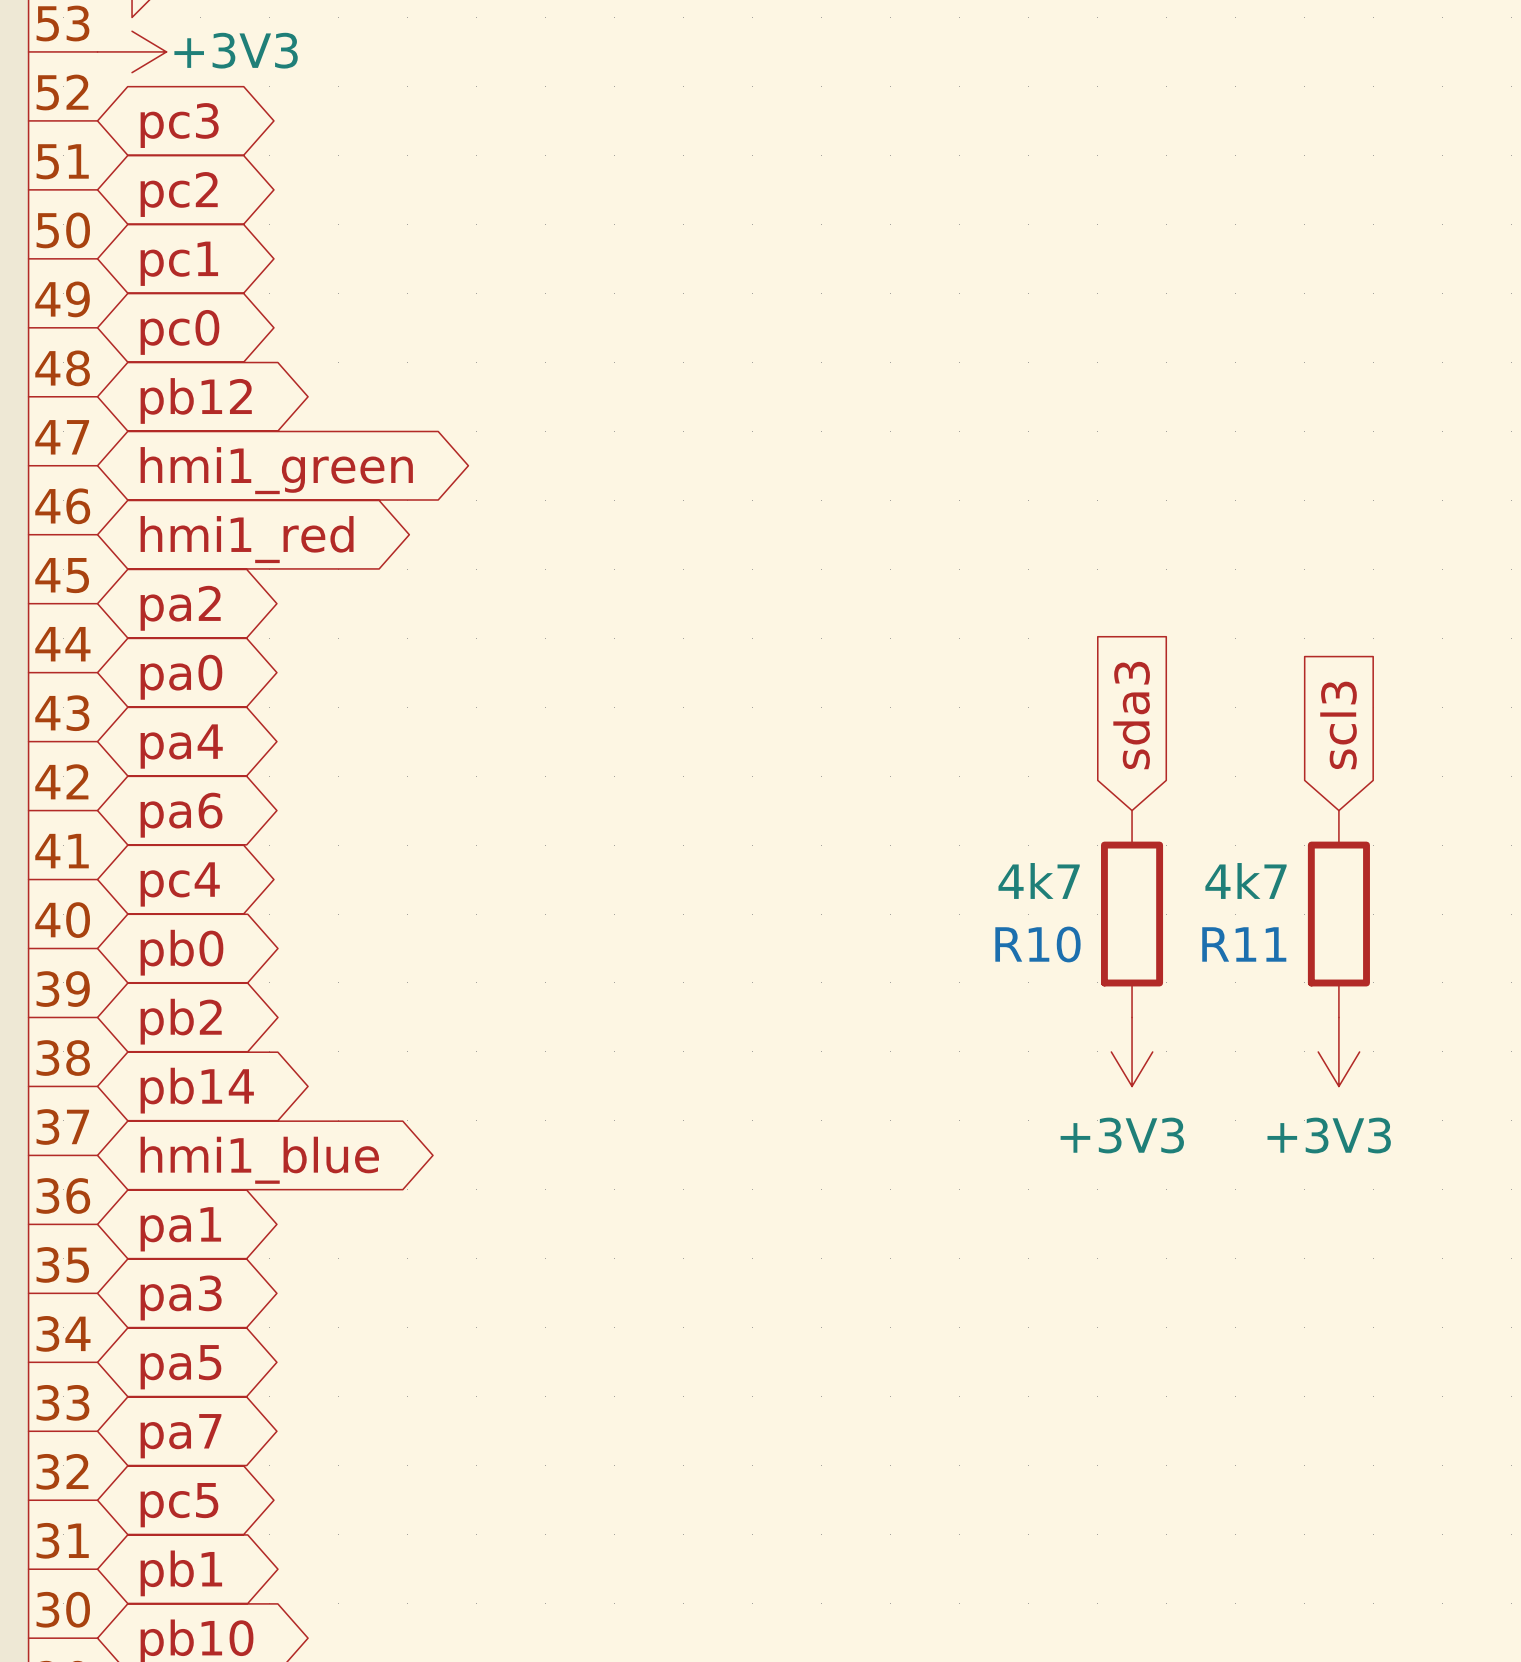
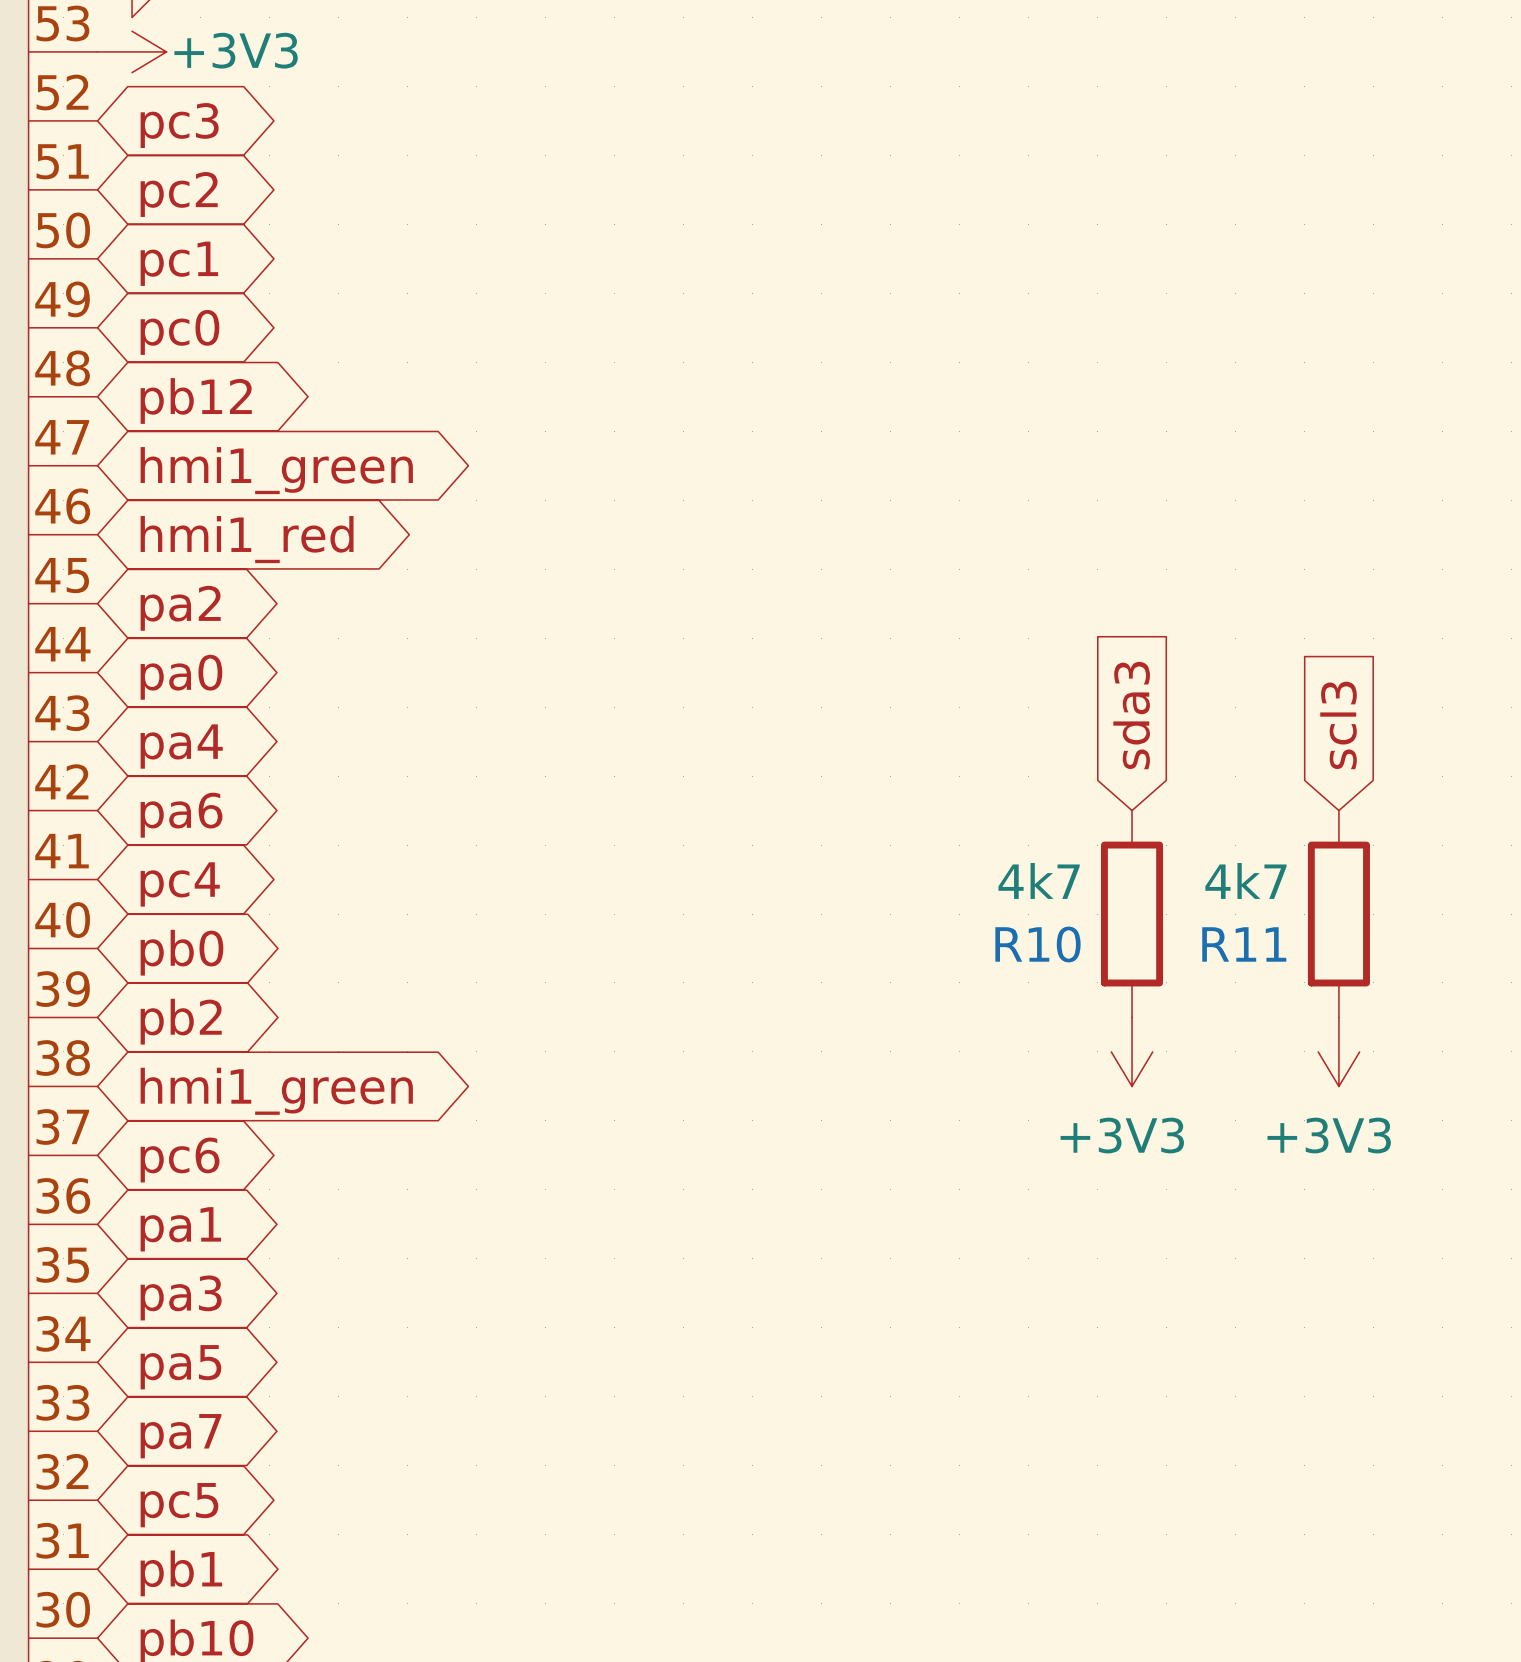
global label: pb14 (197, 1090) -> hmi1_green (276, 1091)
global label: hmi1_blue (259, 1160) -> pc6 (180, 1160)

